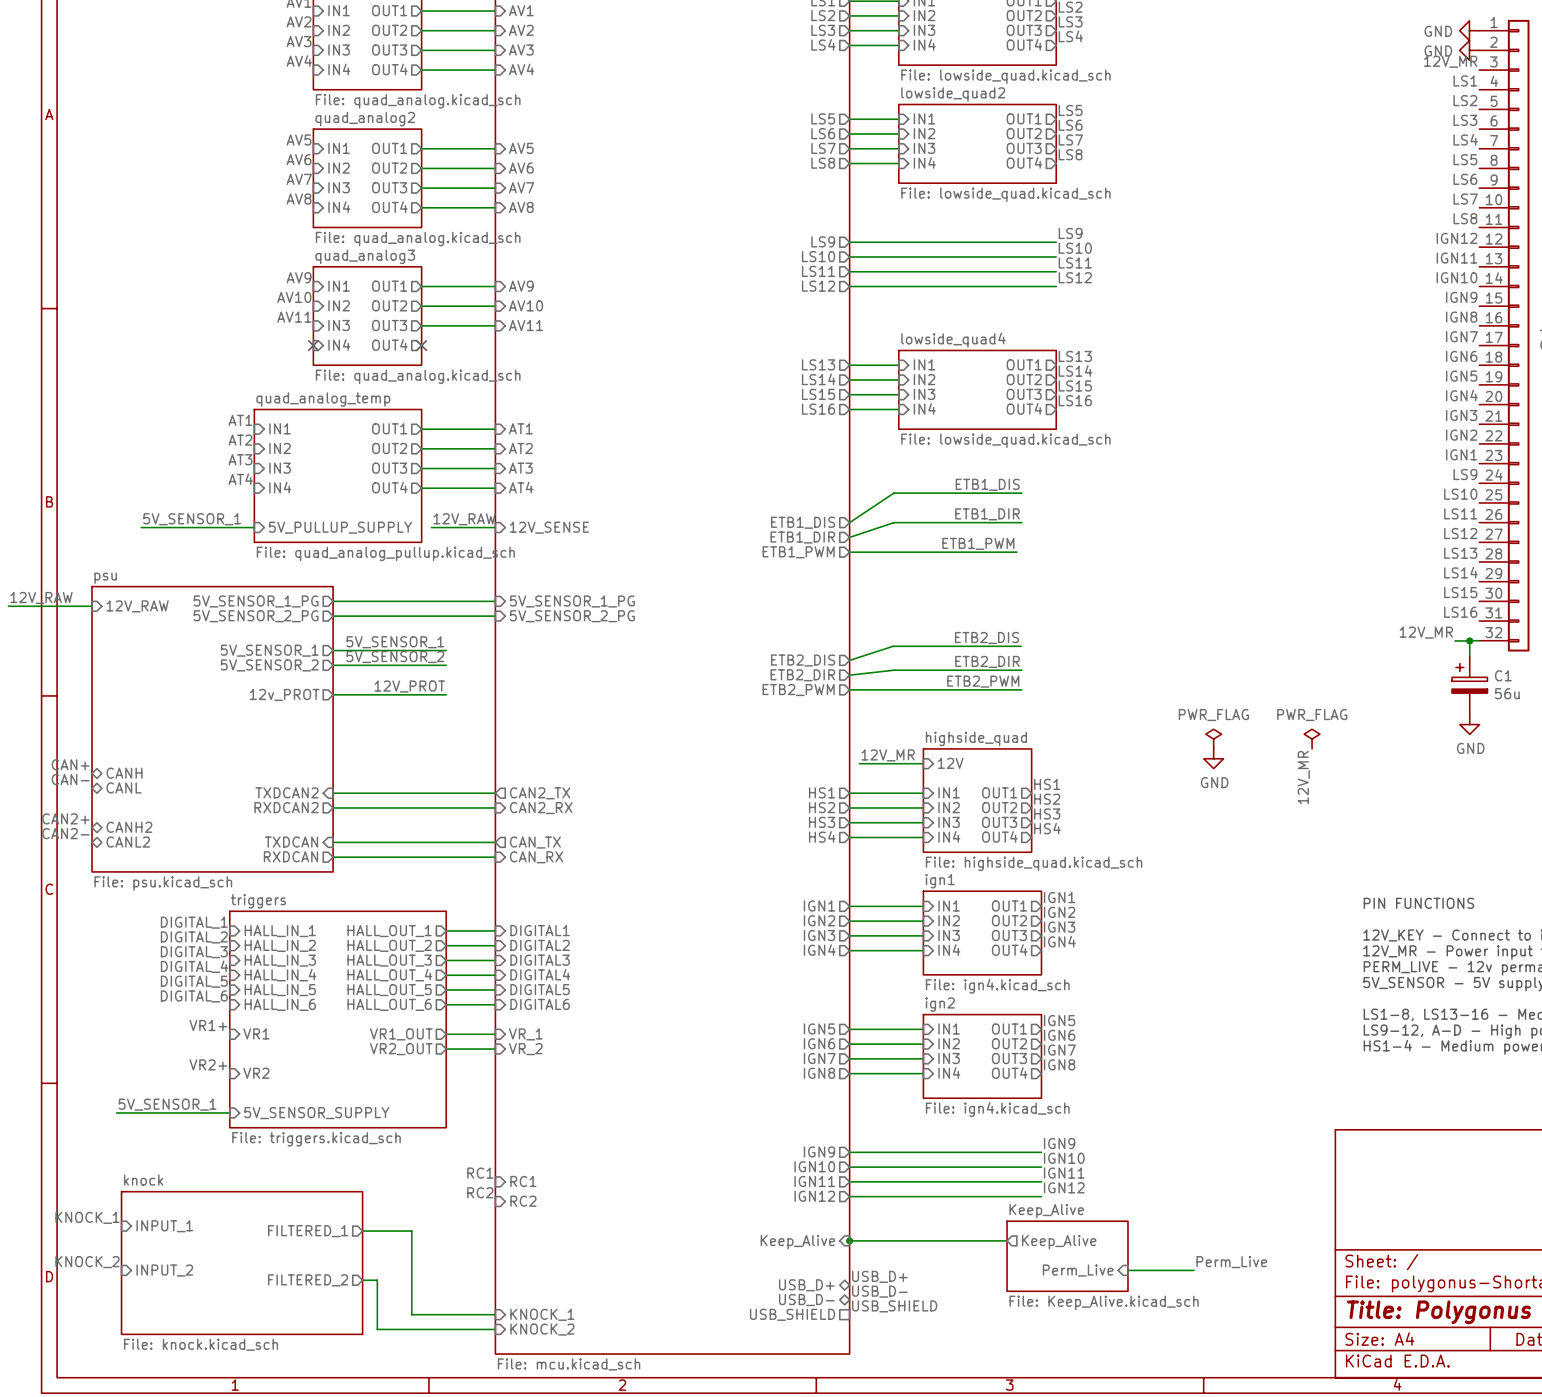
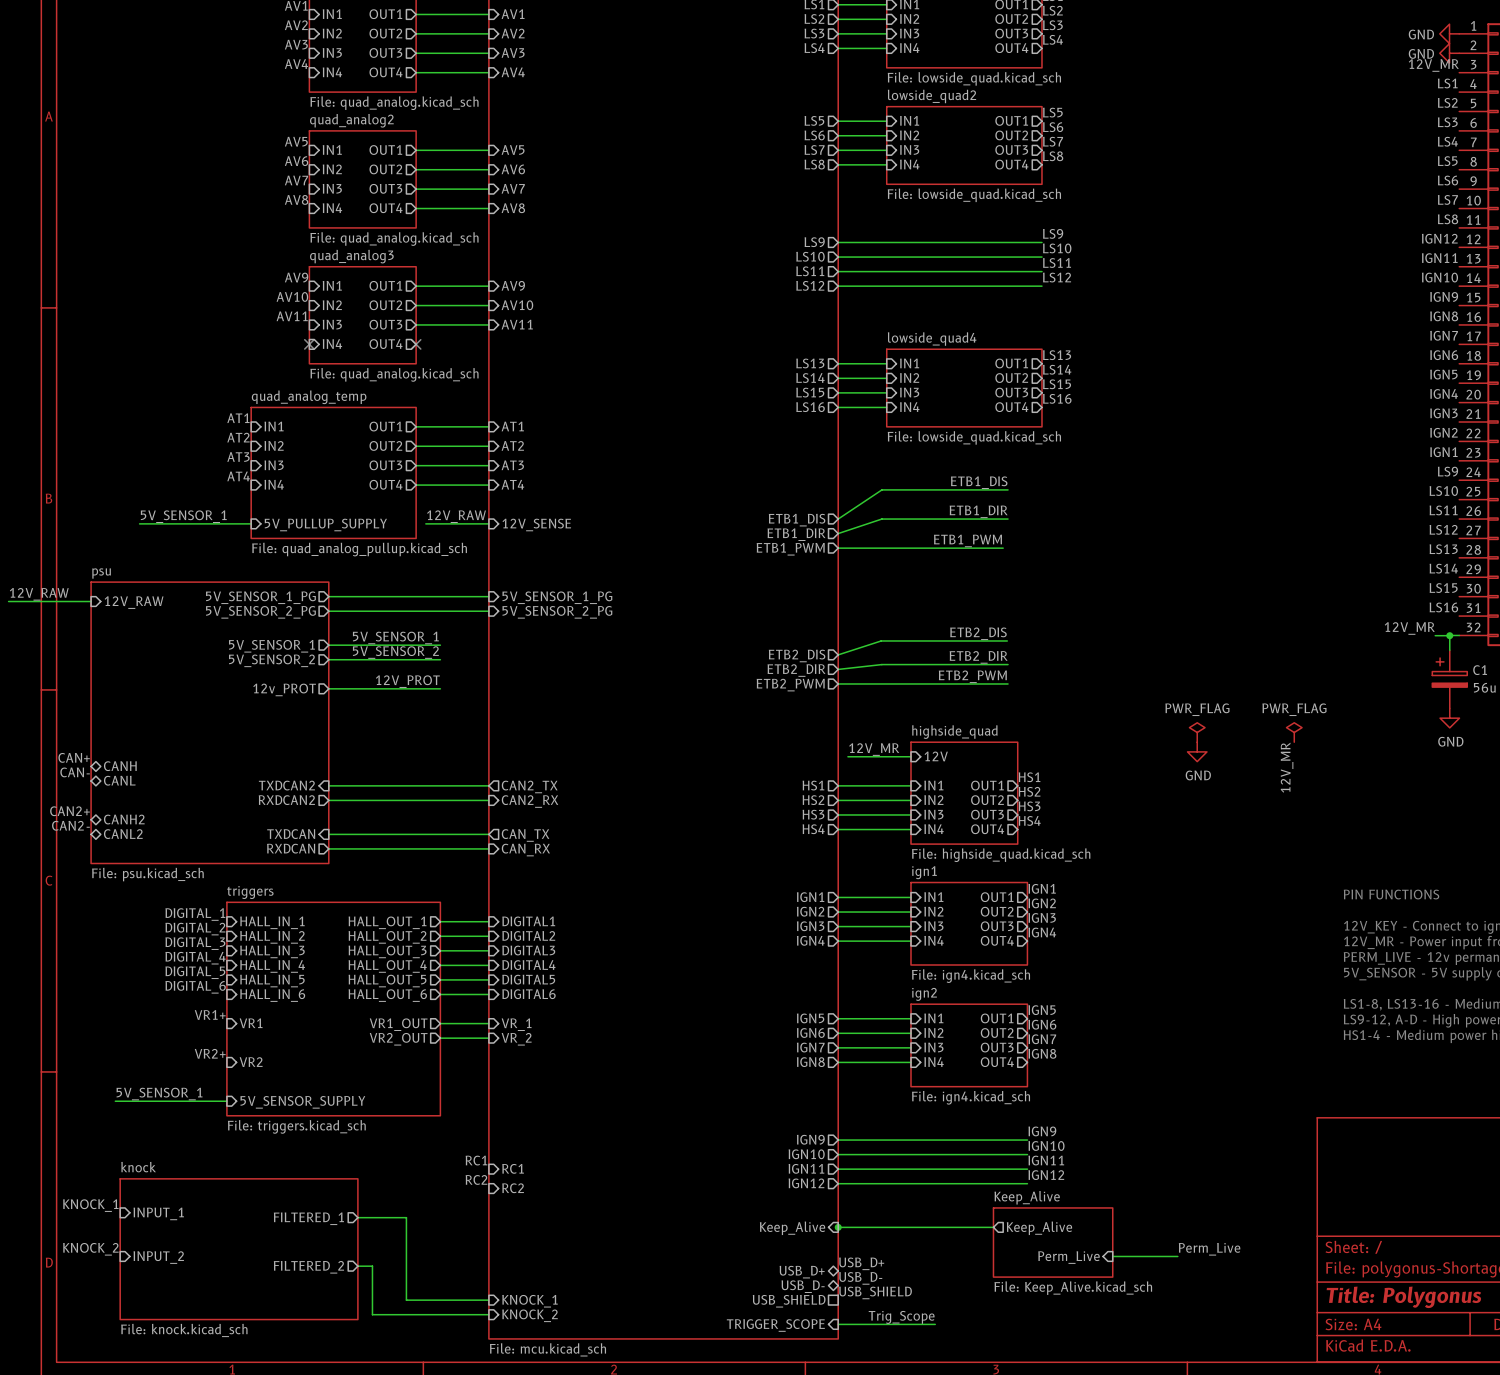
label: none -> Trig_Scope (901, 1317)
sheet pin: none -> TRIGGER_SCOPE (775, 1325)
wire: none -> (838, 1324) (935, 1324)

